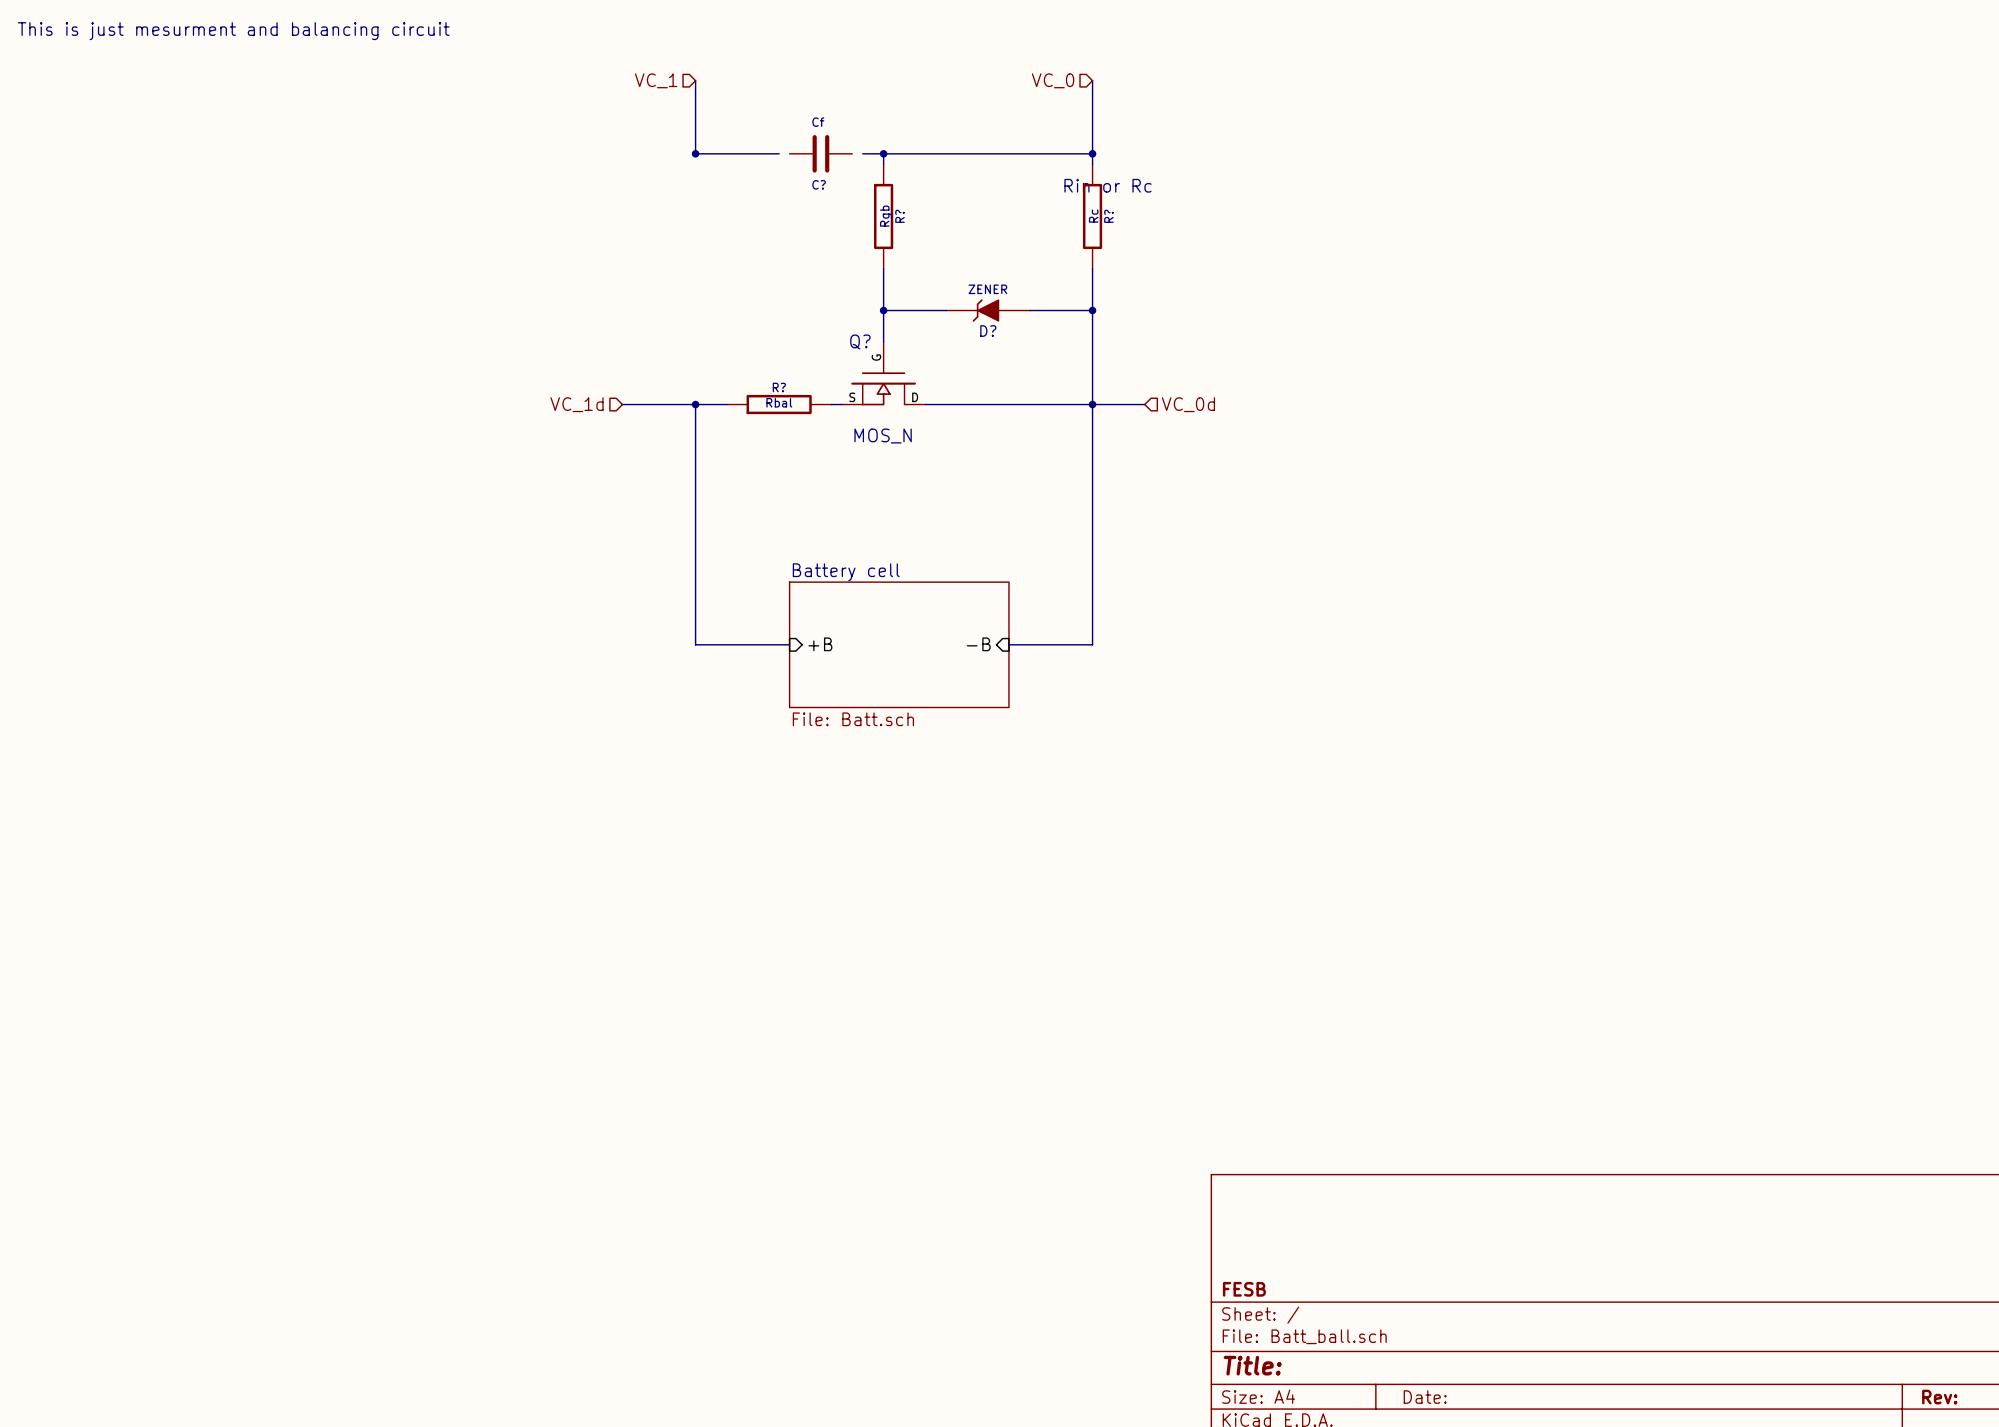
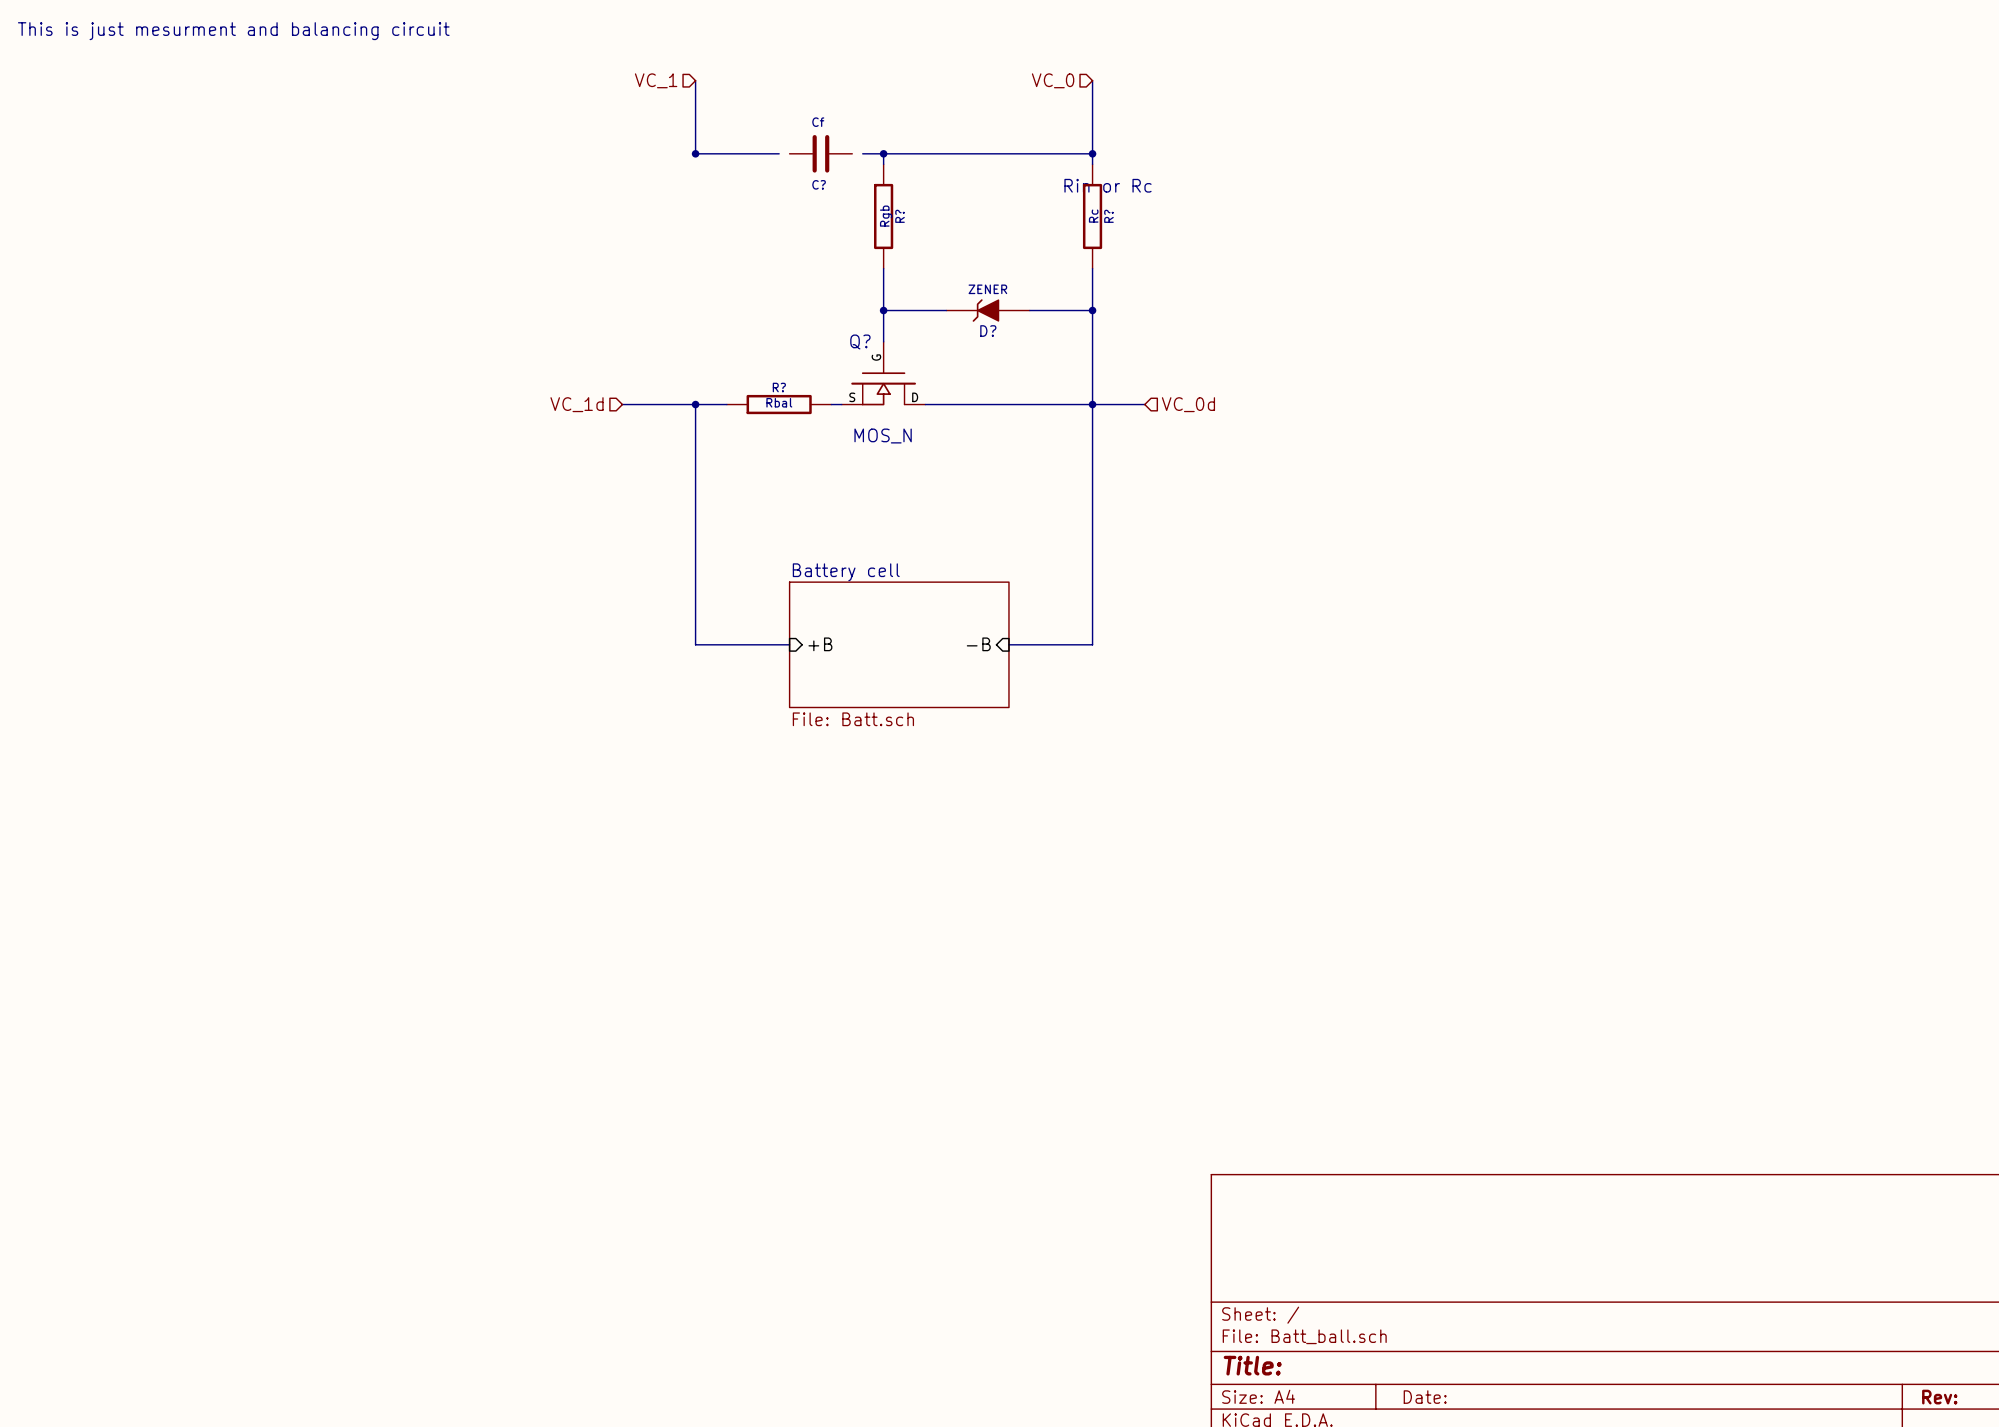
title block: FESB (1244, 1289) -> none

